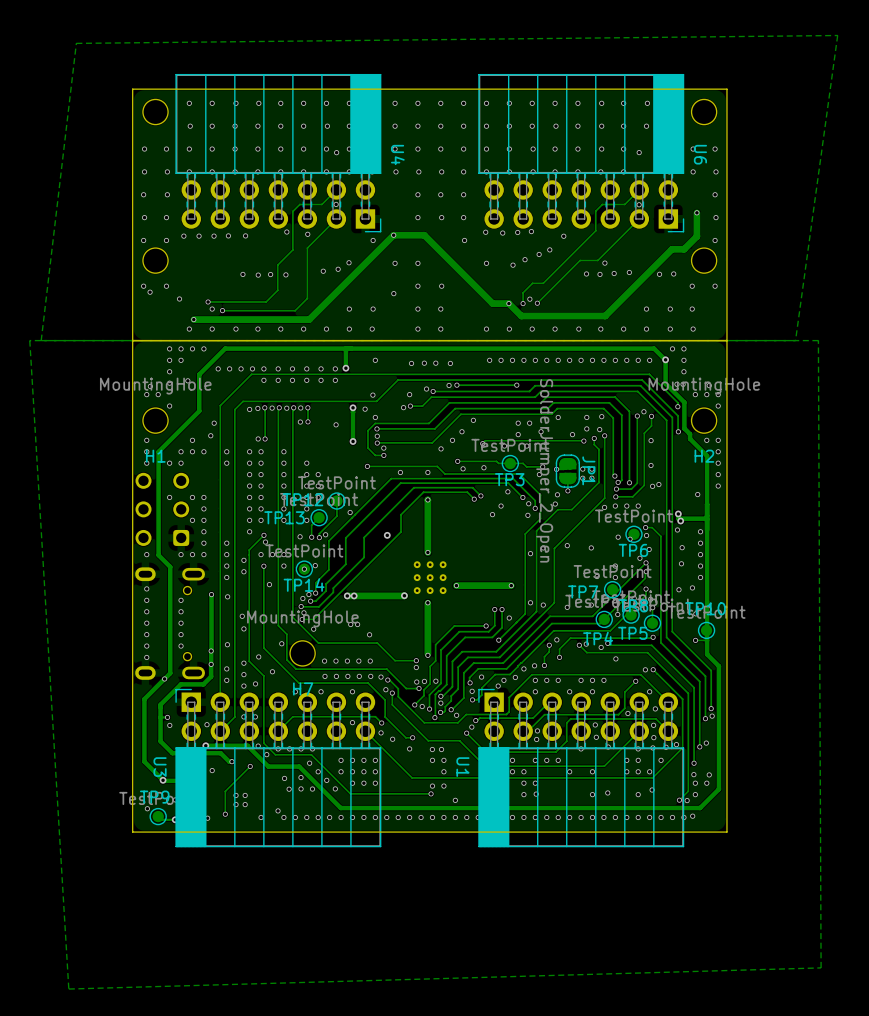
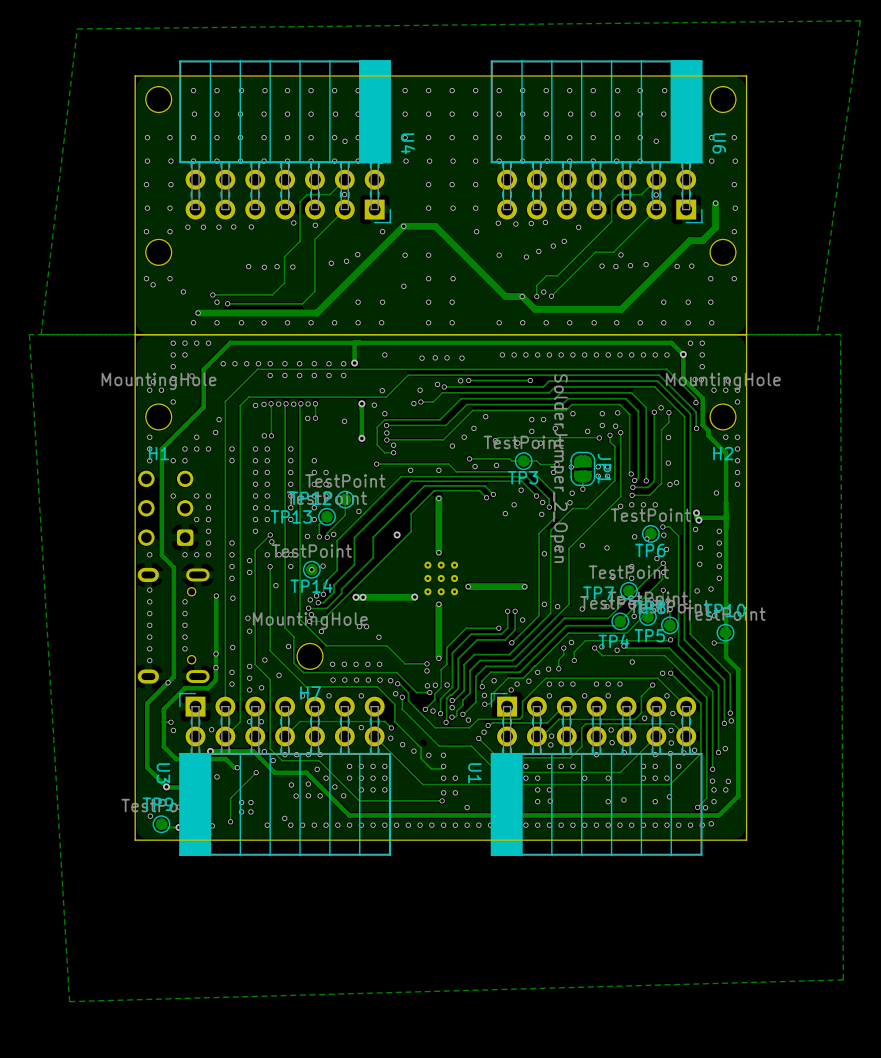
track: (412, 737) (405, 737) -> (443, 768) (431, 768) (420, 758) (420, 747) (416, 743)
via: (412, 737) -> none
via: none -> (413, 751)
via: (409, 748) -> none
via: none -> (428, 755)
via: (441, 749) -> none
via: (443, 760) -> none
via: none -> (443, 778)

